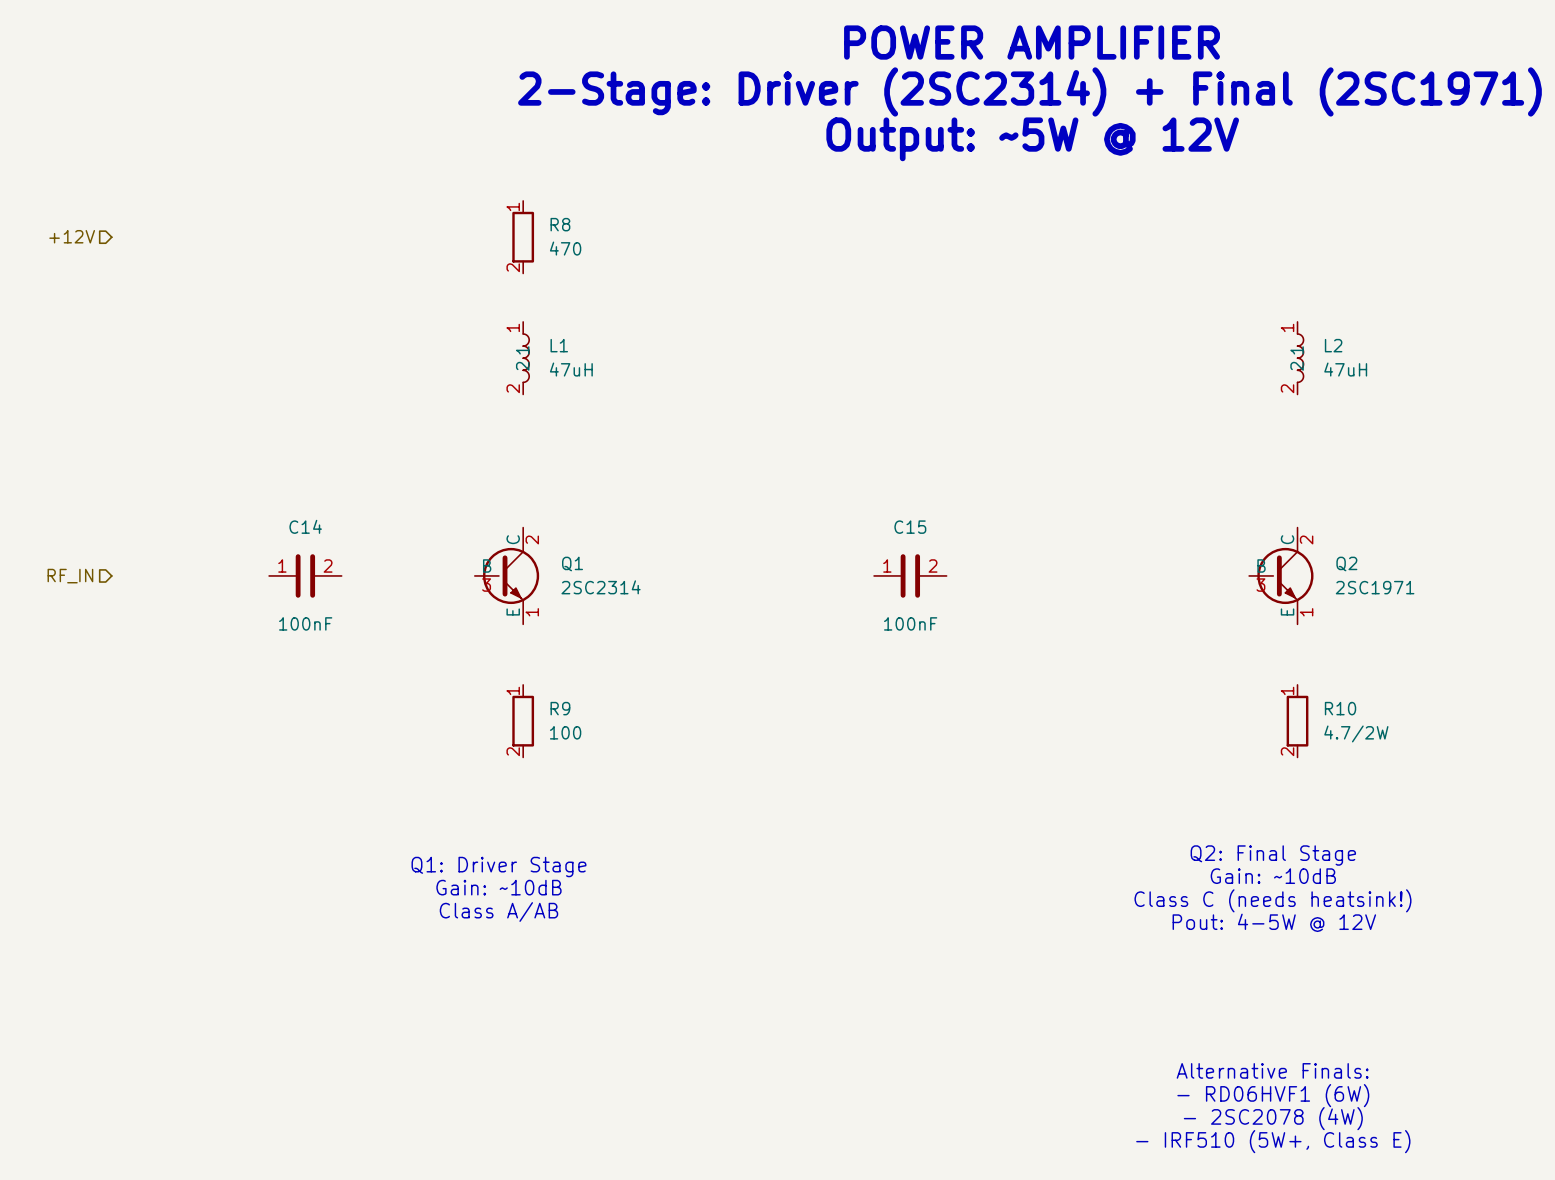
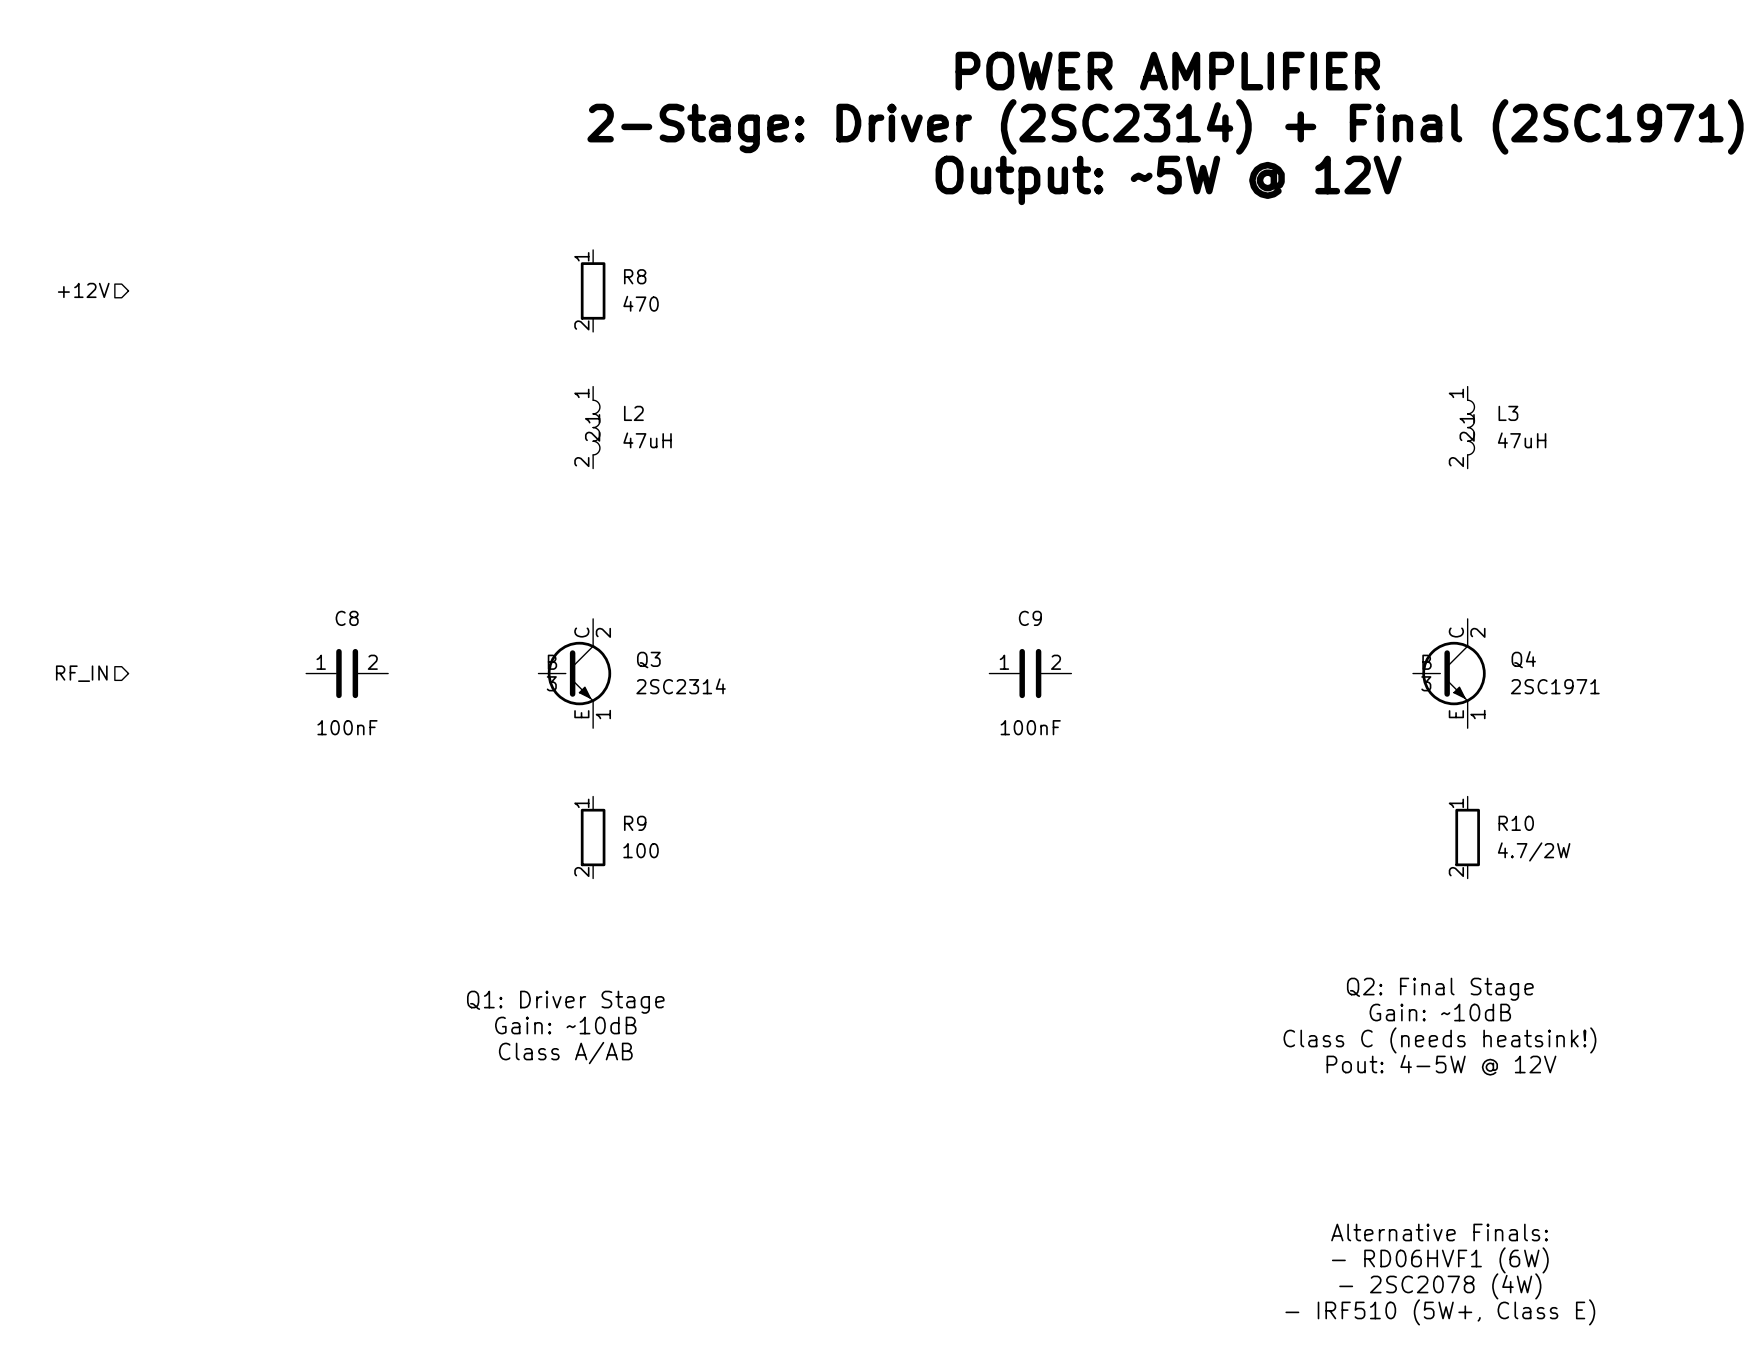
L1 name: L1 (559, 345) -> L2 (633, 413)
L2 name: L2 (1333, 345) -> L3 (1508, 413)
C14 name: C14 (305, 526) -> C8 (347, 618)
C15 name: C15 (910, 527) -> C9 (1030, 618)
Q1 name: Q1 (572, 564) -> Q3 (648, 660)
Q2 name: Q2 (1346, 564) -> Q4 (1523, 659)

